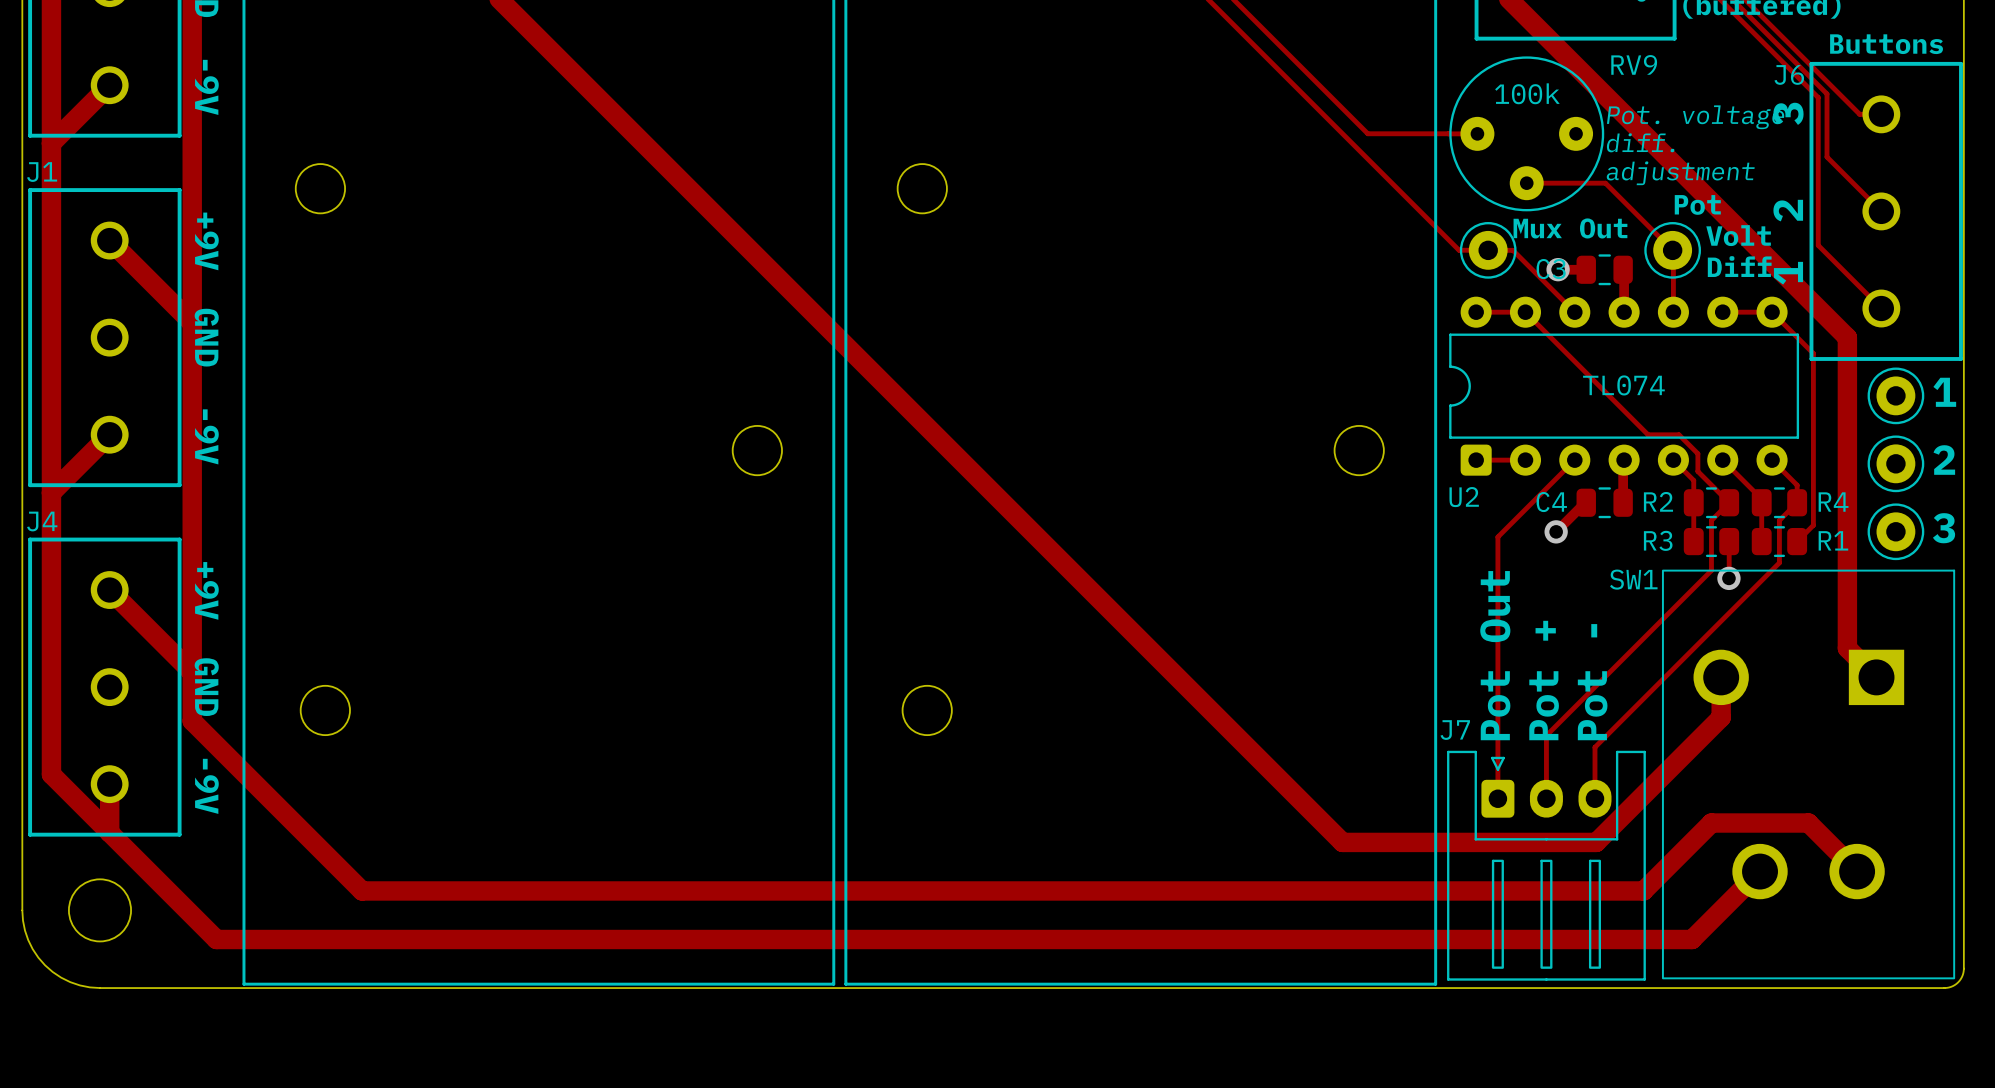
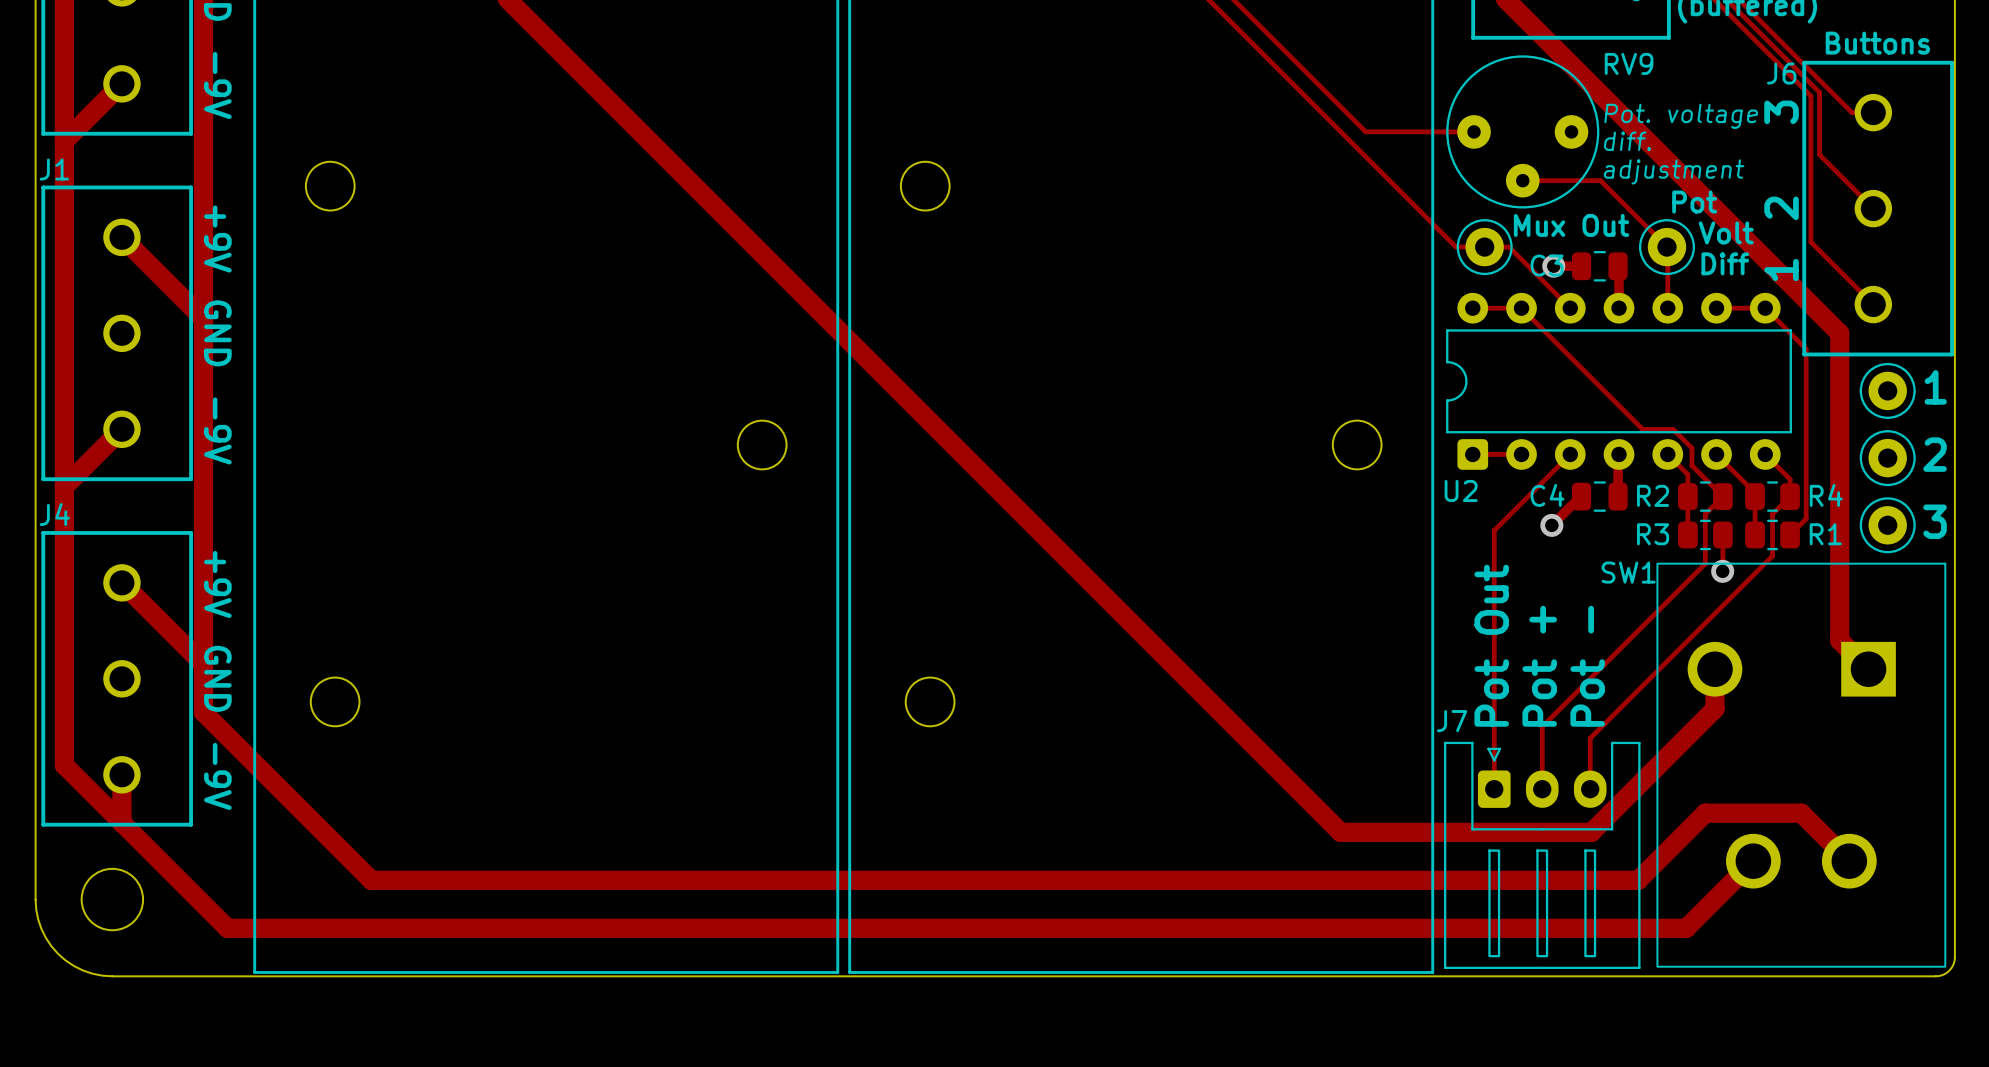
text: 100k (1527, 93) -> none
U2 value: TL074 (1623, 385) -> none

